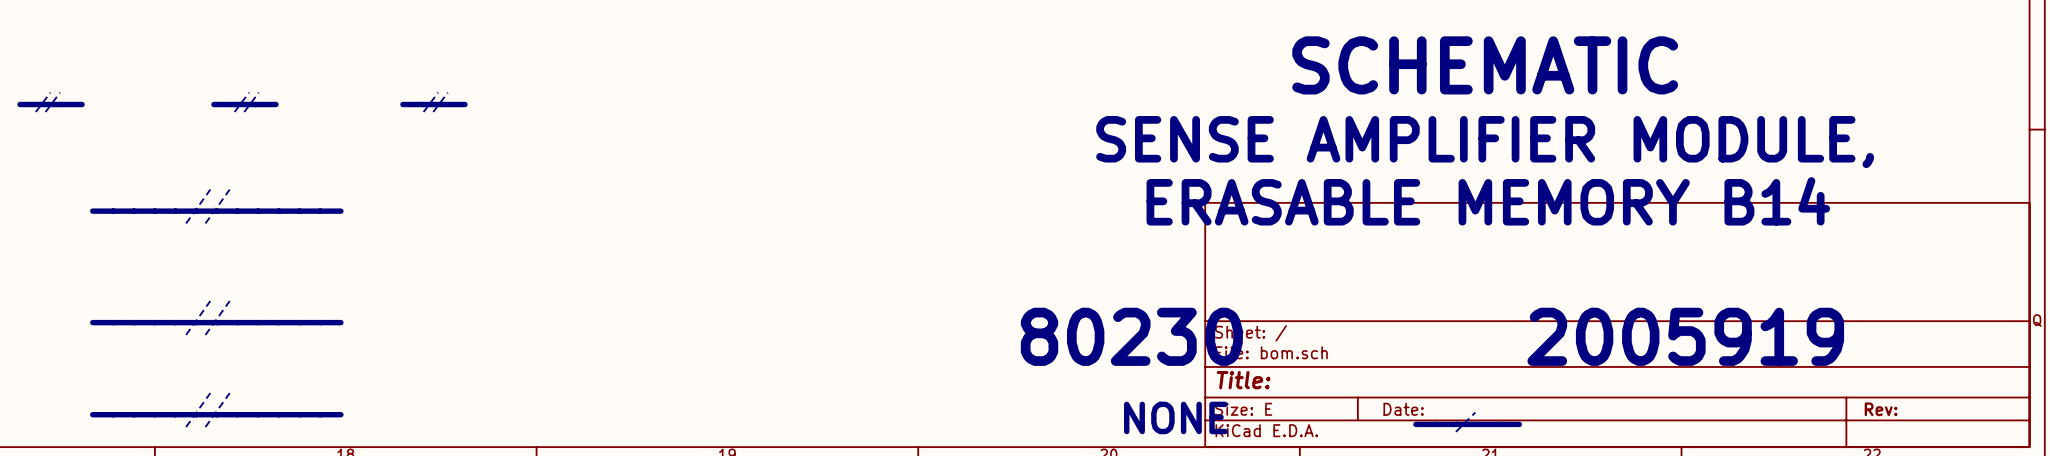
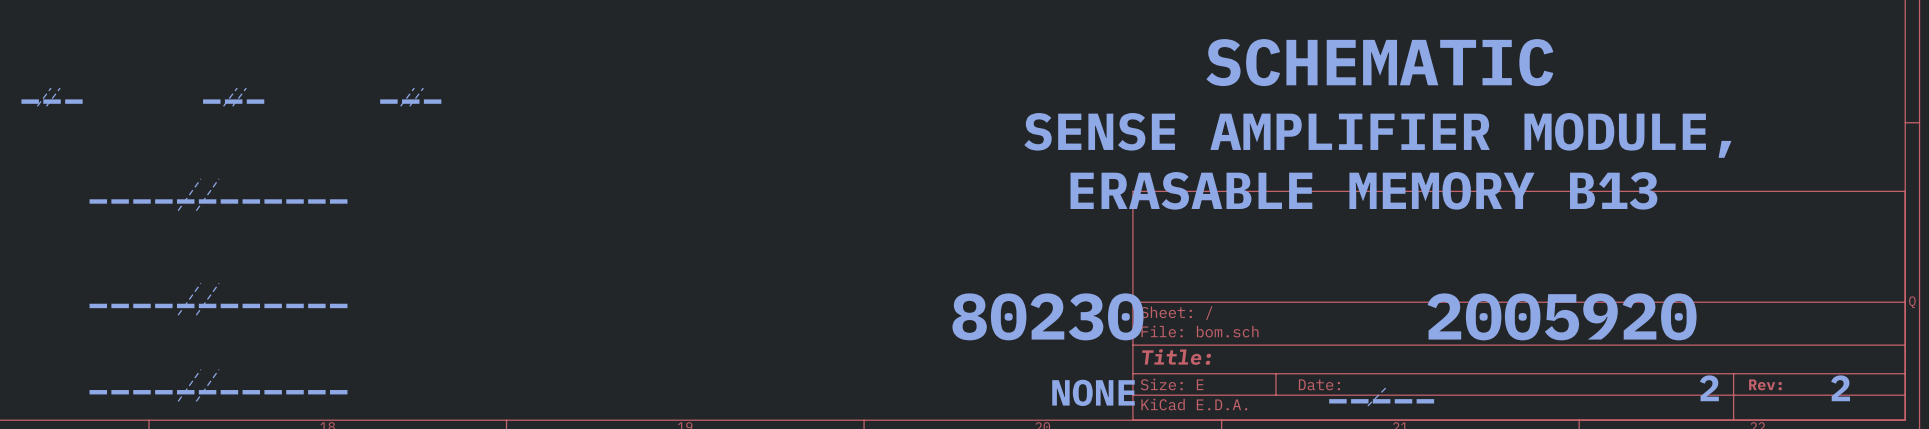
text: ERASABLE MEMORY B14 (1488, 201) -> ERASABLE MEMORY B13 (1363, 190)
text: 2005919 (1685, 336) -> 2005920 (1562, 316)
text: none -> 2 2 (1775, 388)

